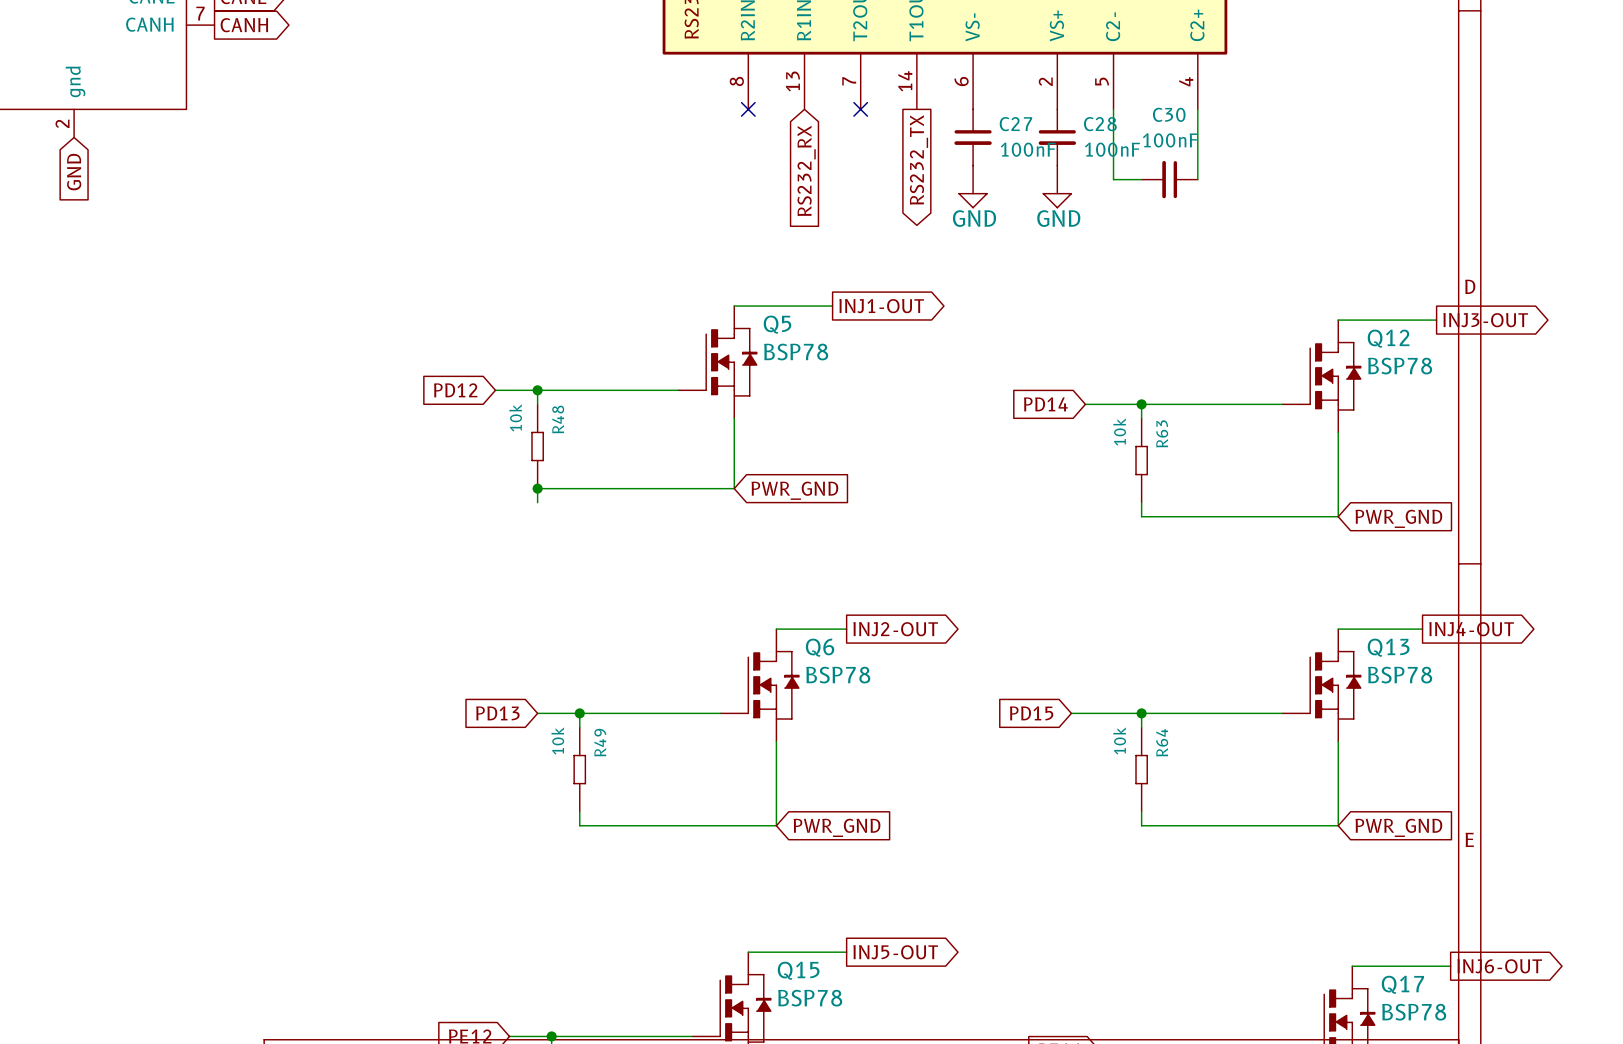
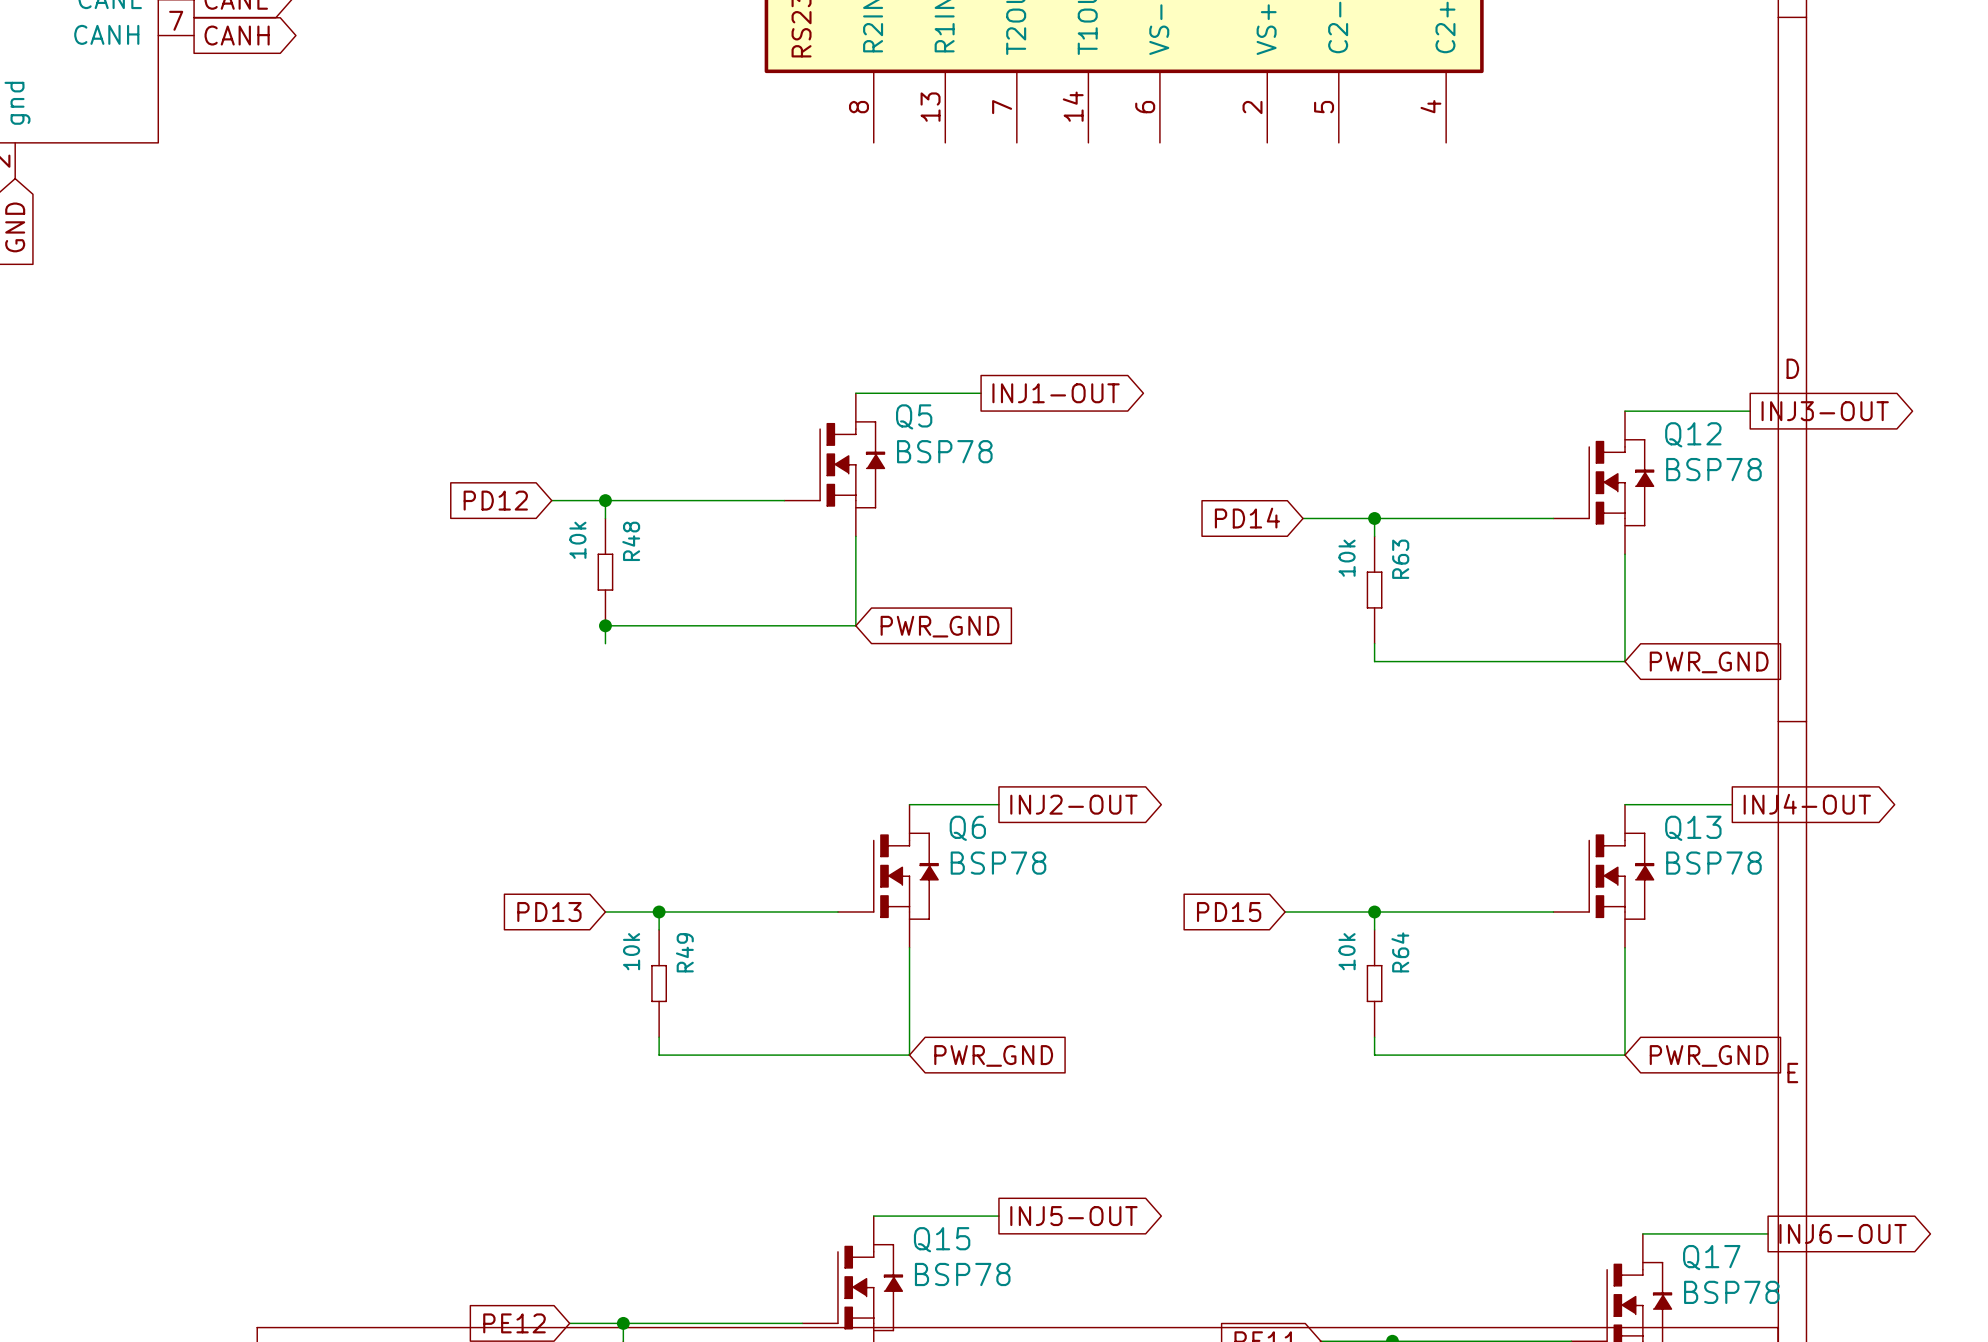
no-connect mark: (748, 109) -> none
no-connect mark: (860, 109) -> none
wire: (1113, 109) (1113, 179) (1141, 179) -> none
wire: (1197, 109) (1197, 179) -> none
C27: 100nF (973, 137) -> none
C28: 100nF (1057, 137) -> none
global label: RS232_TX (918, 159) -> none
global label: RS232_RX (806, 170) -> none
C30: 100nF (1169, 179) -> none
power symbol: GND (973, 186) -> none
power symbol: GND (1057, 186) -> none

